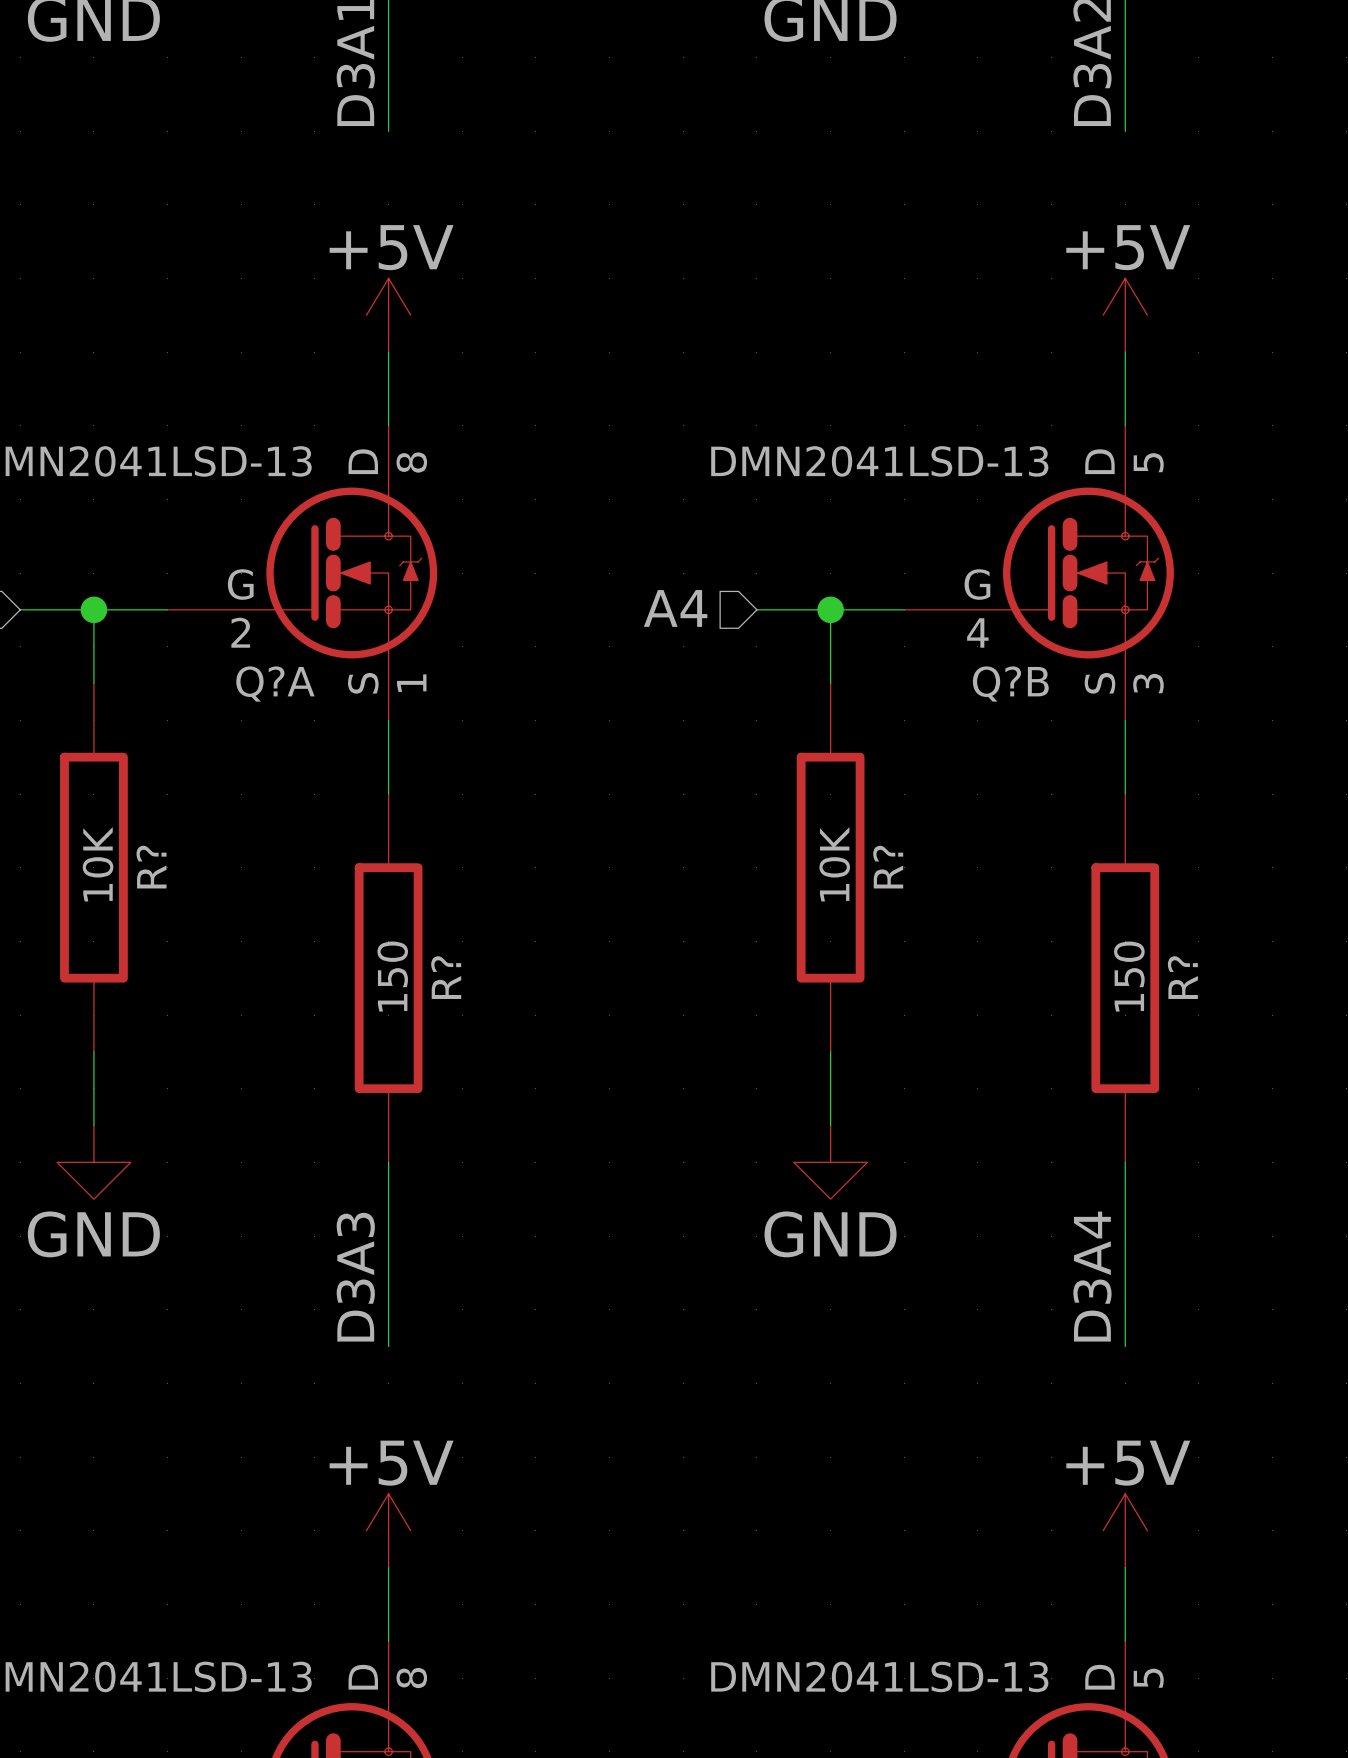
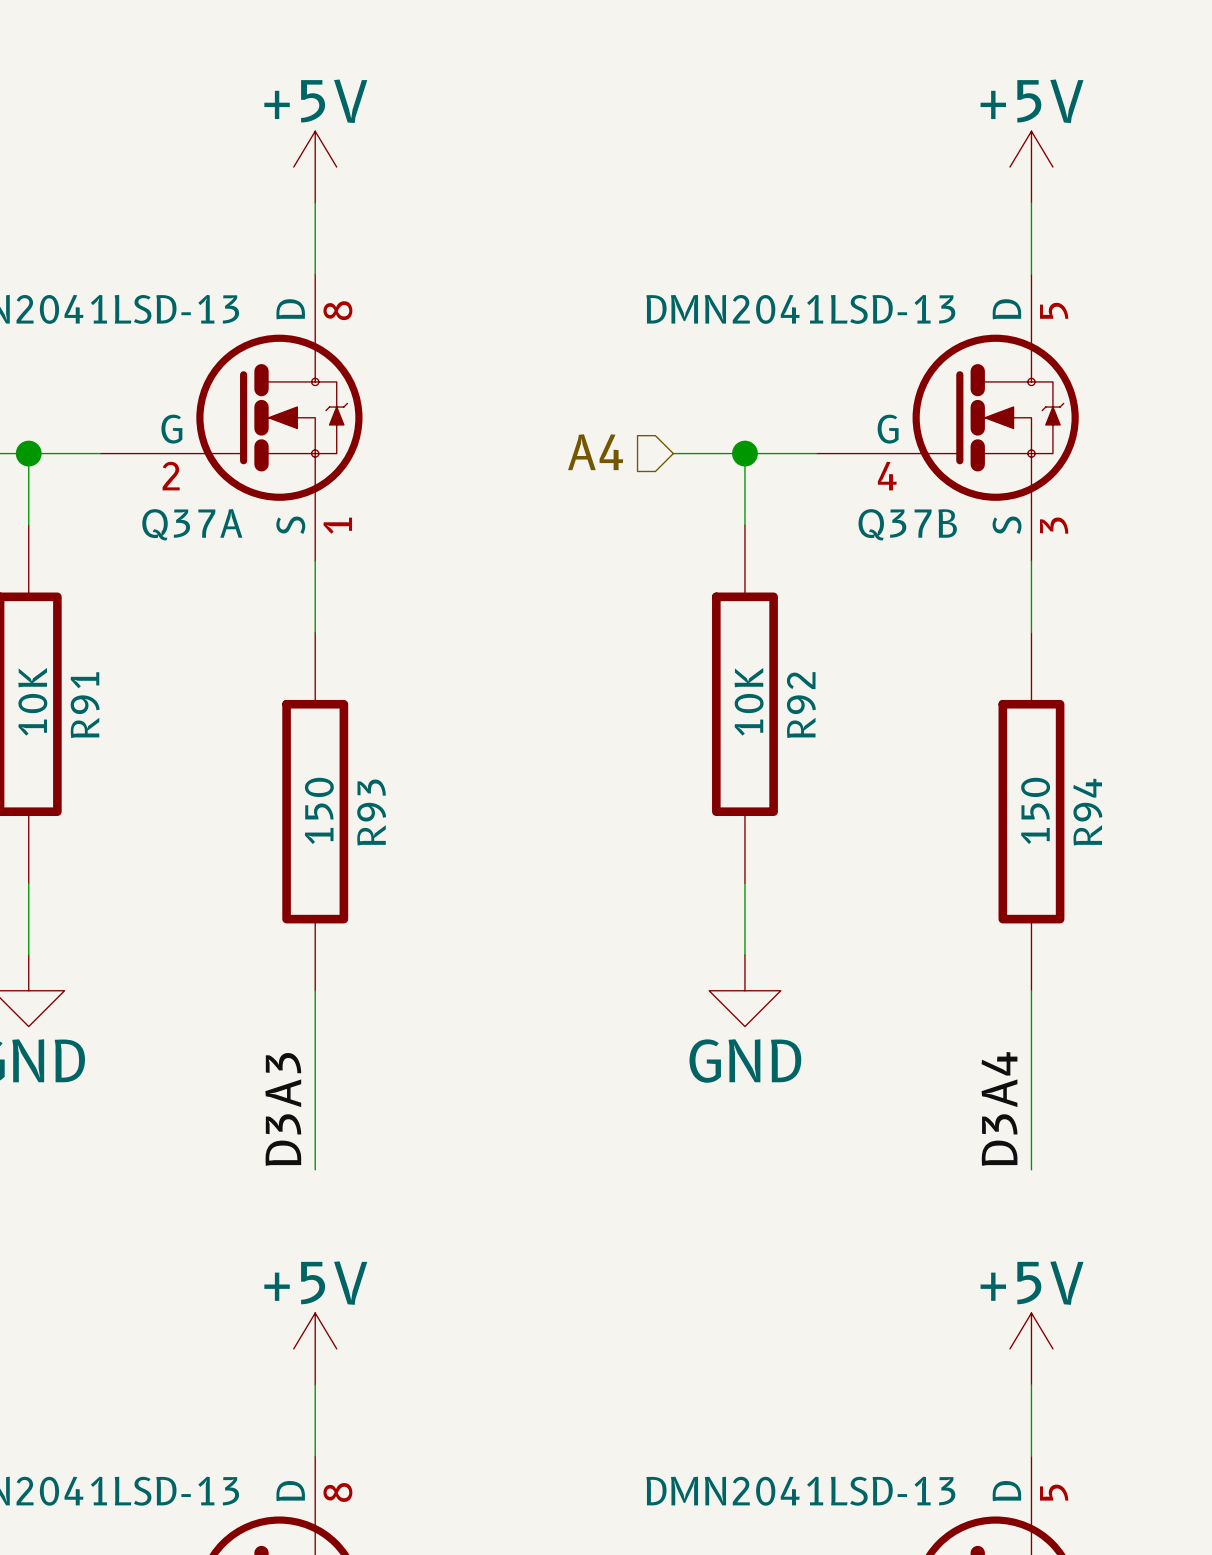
Q?A name: Q?A (275, 684) -> Q37A (192, 524)
Q?B name: Q?B (1010, 684) -> Q37B (907, 524)
R? name: R? (151, 867) -> R91 (85, 705)
R? name: R? (888, 867) -> R92 (801, 705)
R? name: R? (446, 977) -> R93 (371, 812)
R? name: R? (1182, 977) -> R94 (1087, 812)

